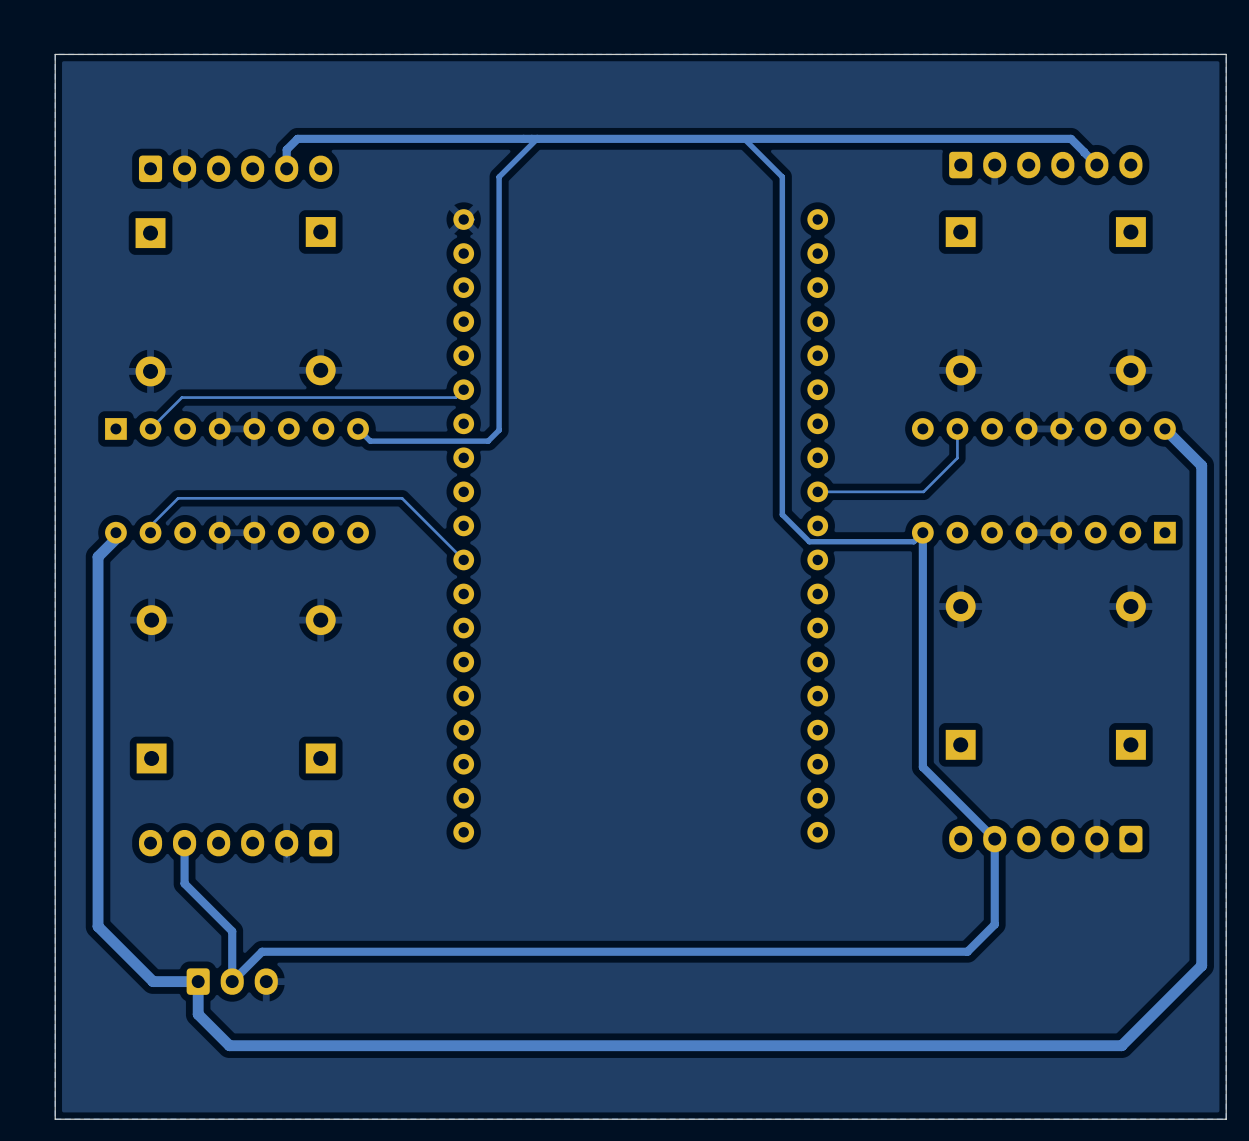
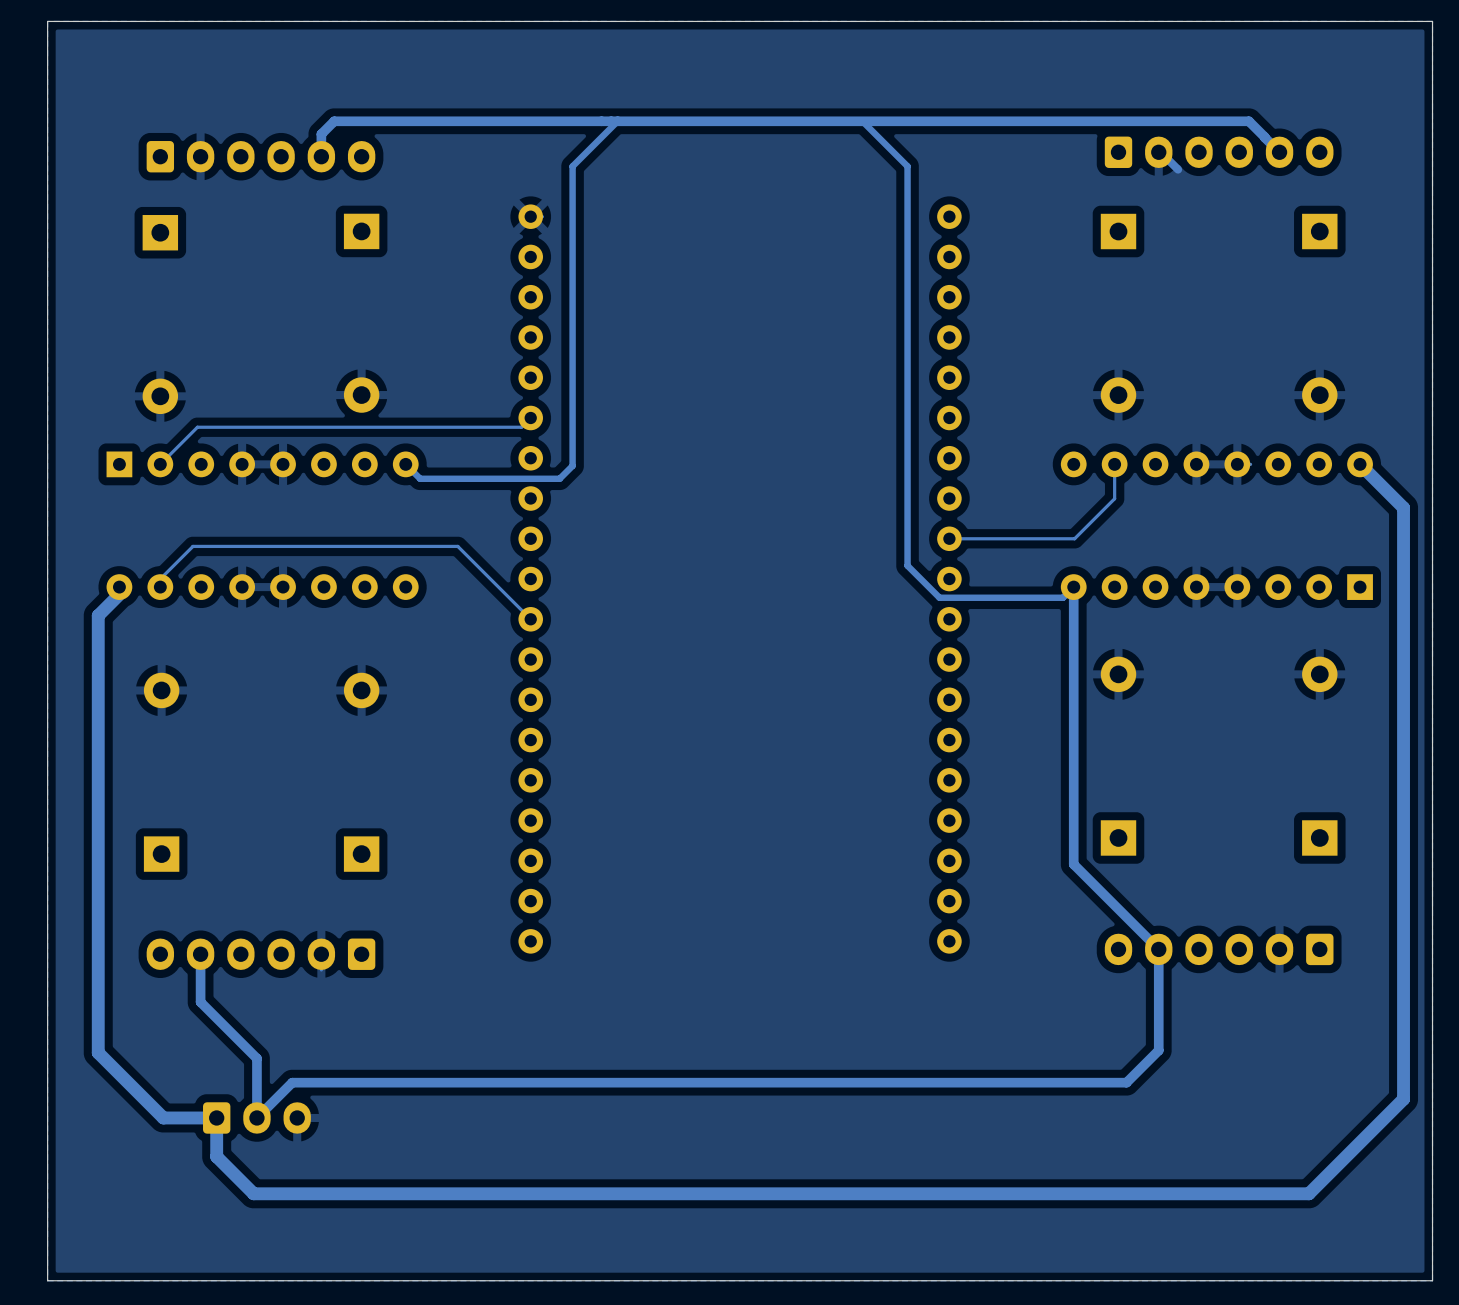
track: none -> (1160, 152) (1178, 169)

